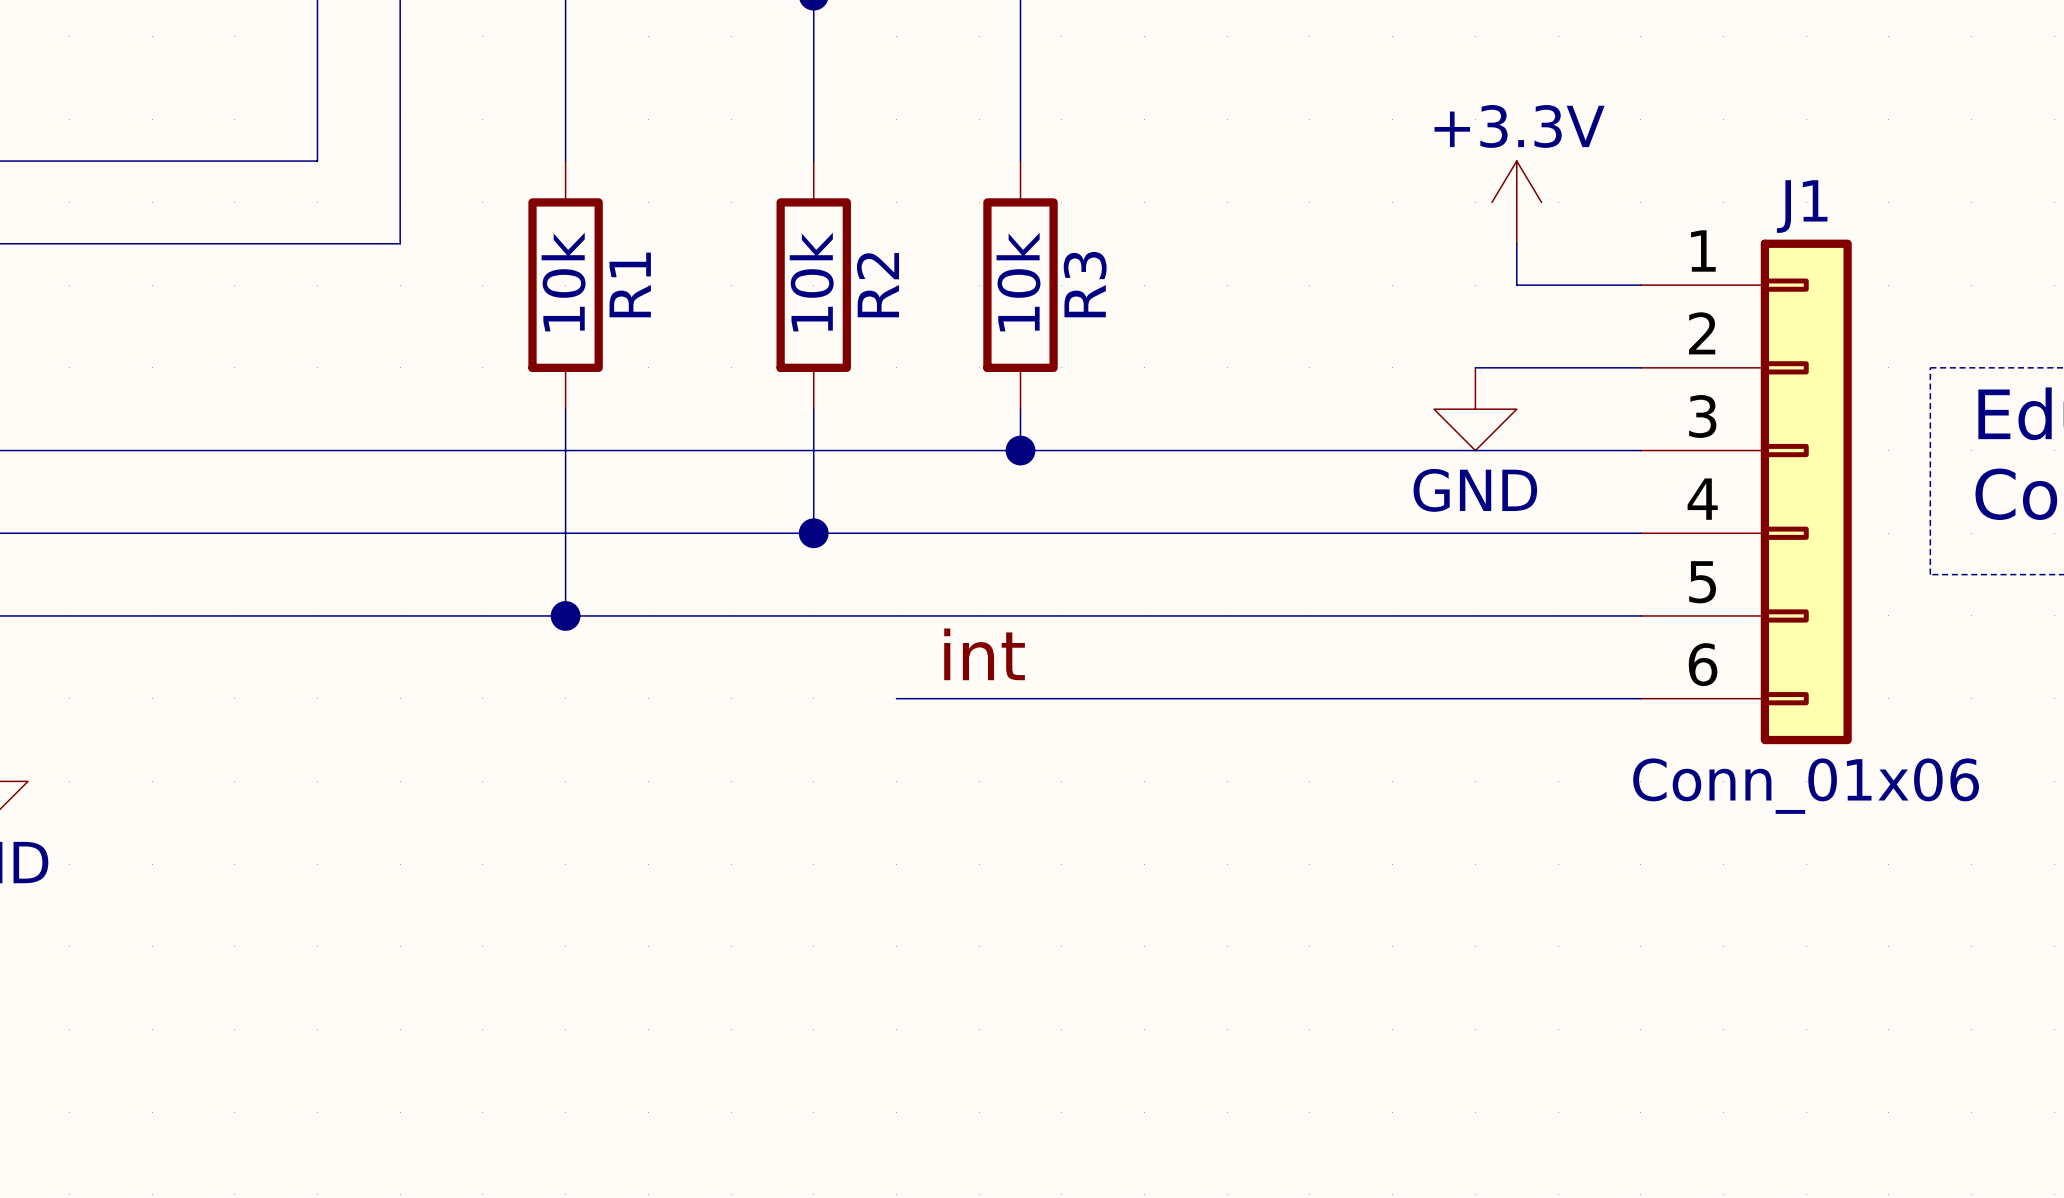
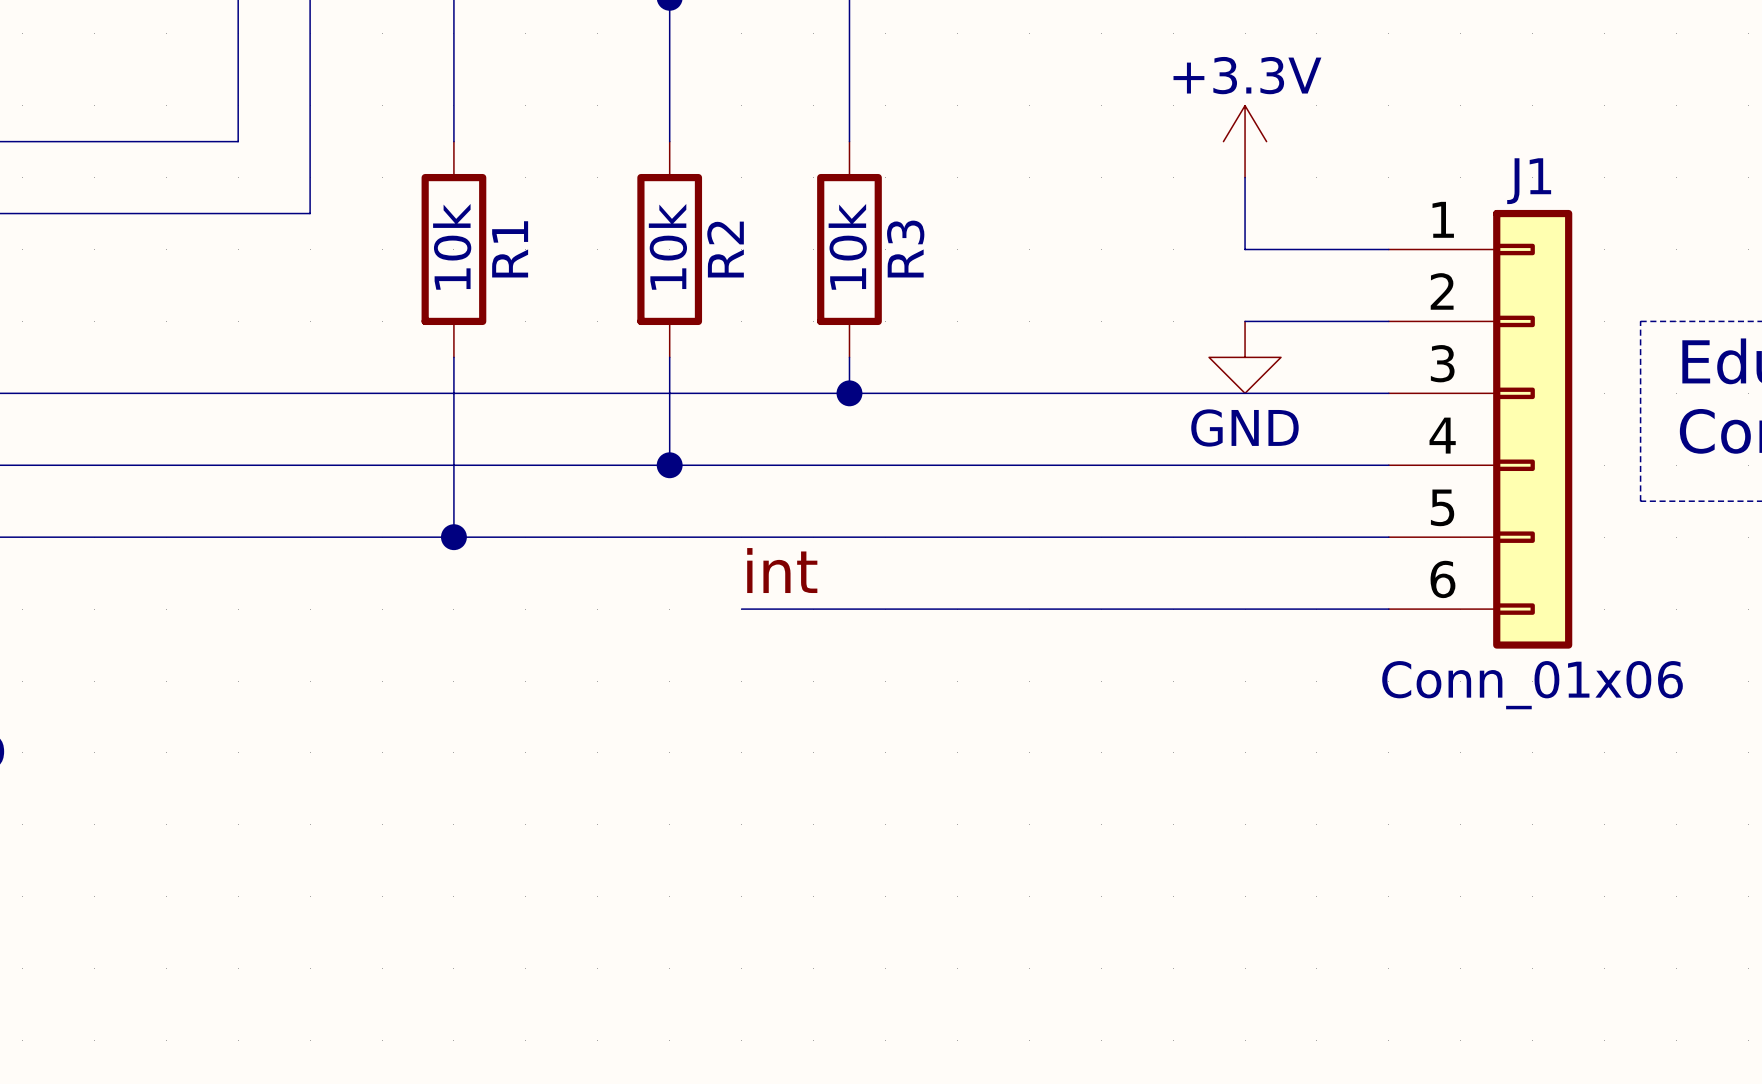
power symbol position: +3.3V (1516, 202) -> +3.3V (1245, 141)
wire: (1516, 243) (1516, 285) -> (1245, 177) (1245, 249) (1280, 249)
label position: int (984, 654) -> int (782, 570)

